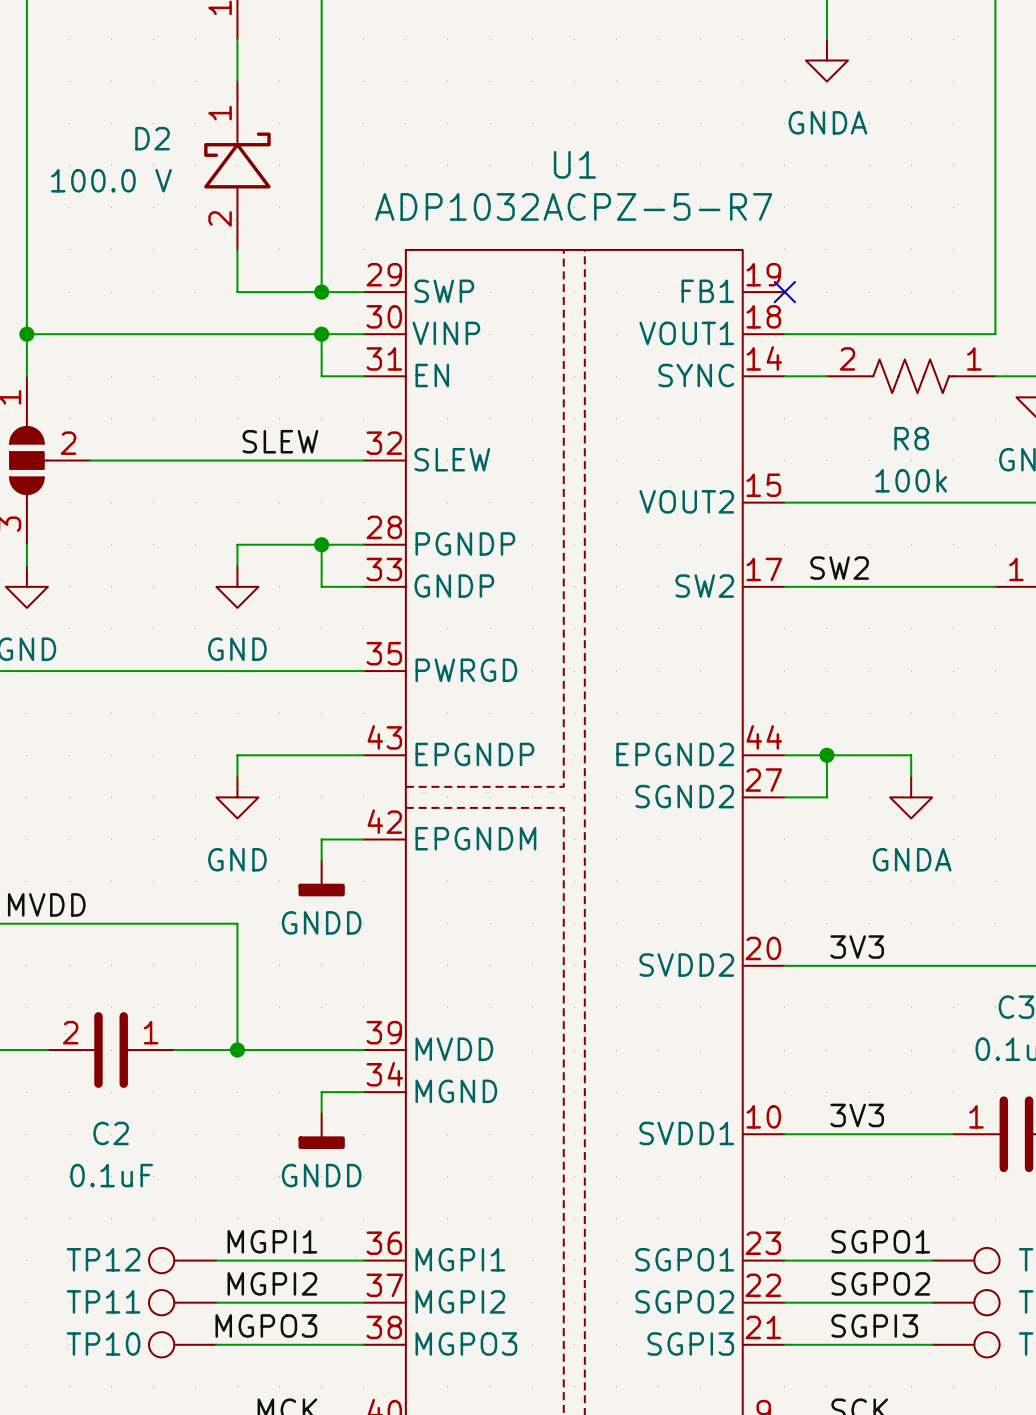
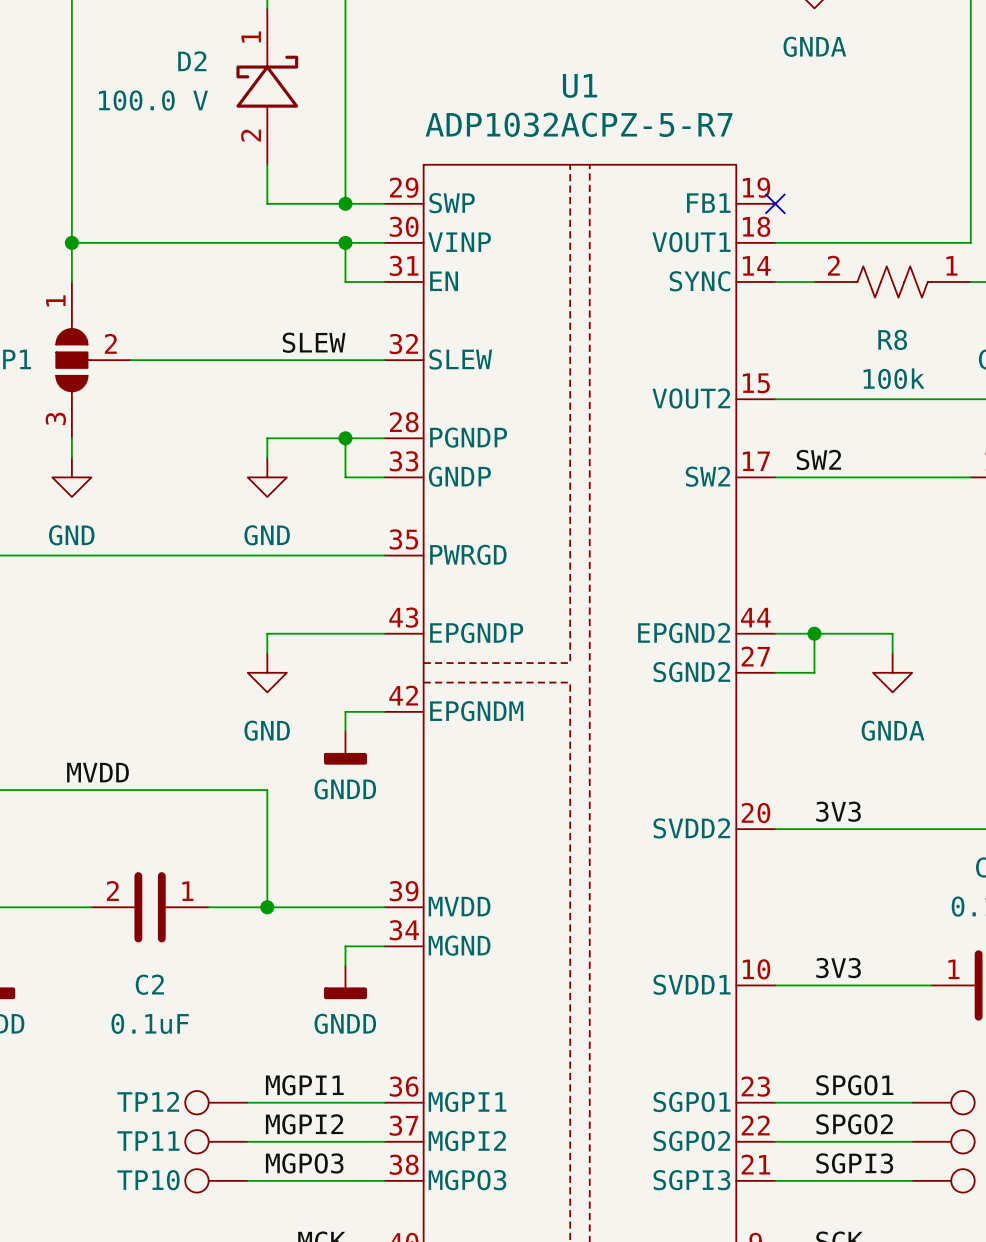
label: SGPO1 (880, 1241) -> SPGO1 (854, 1085)
label: SGPO2 (880, 1283) -> SPGO2 (854, 1124)

